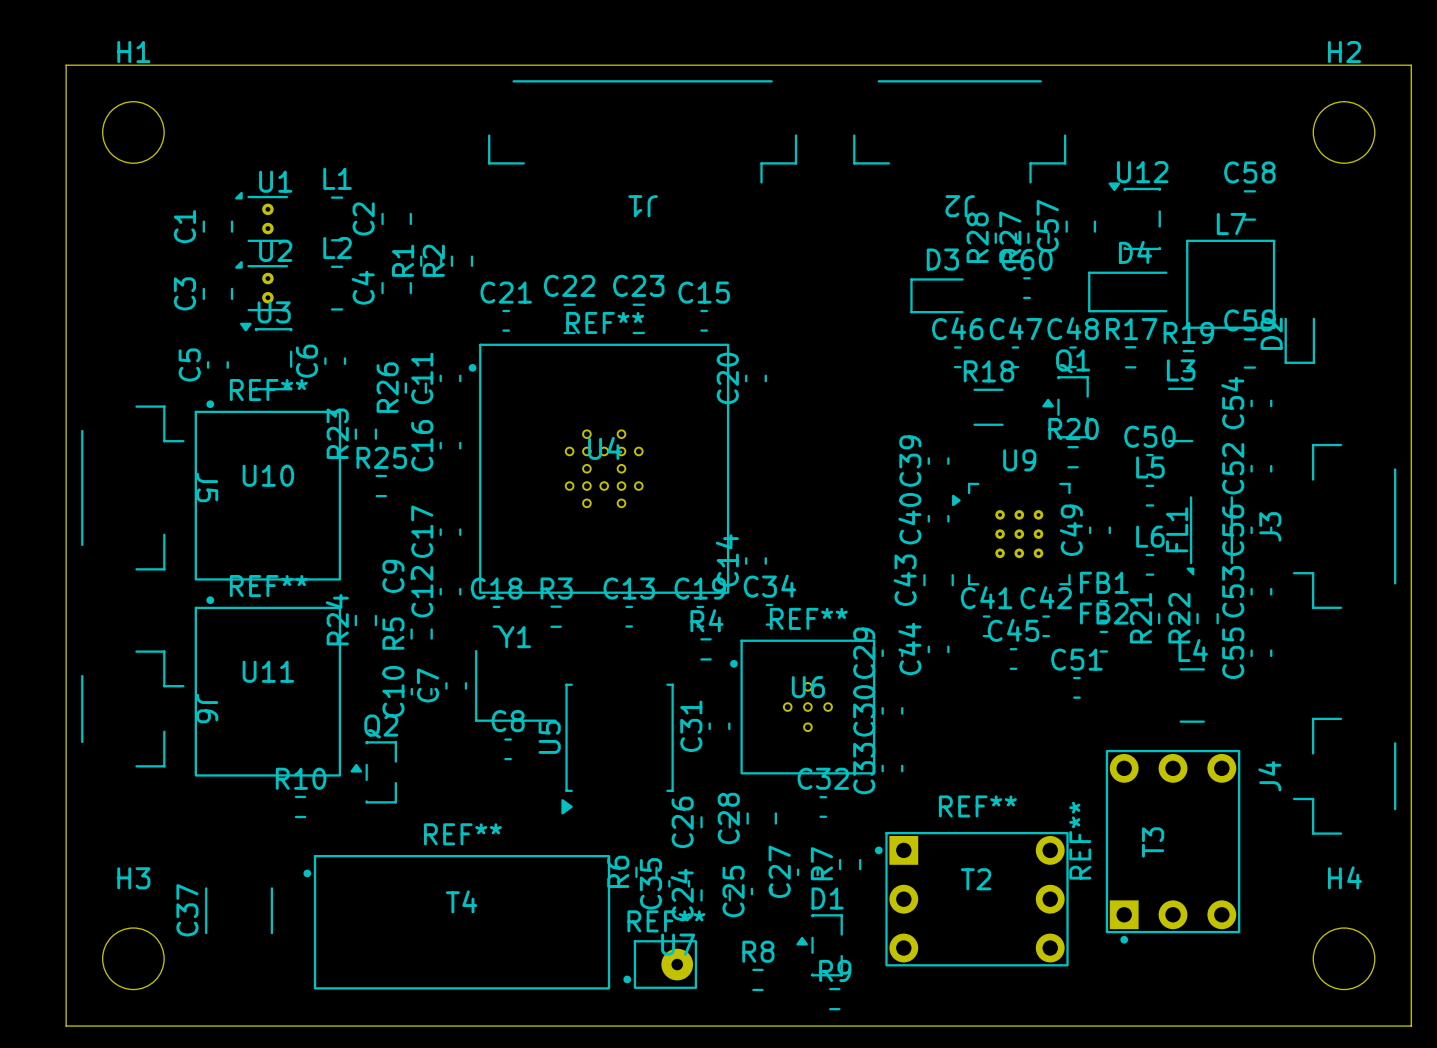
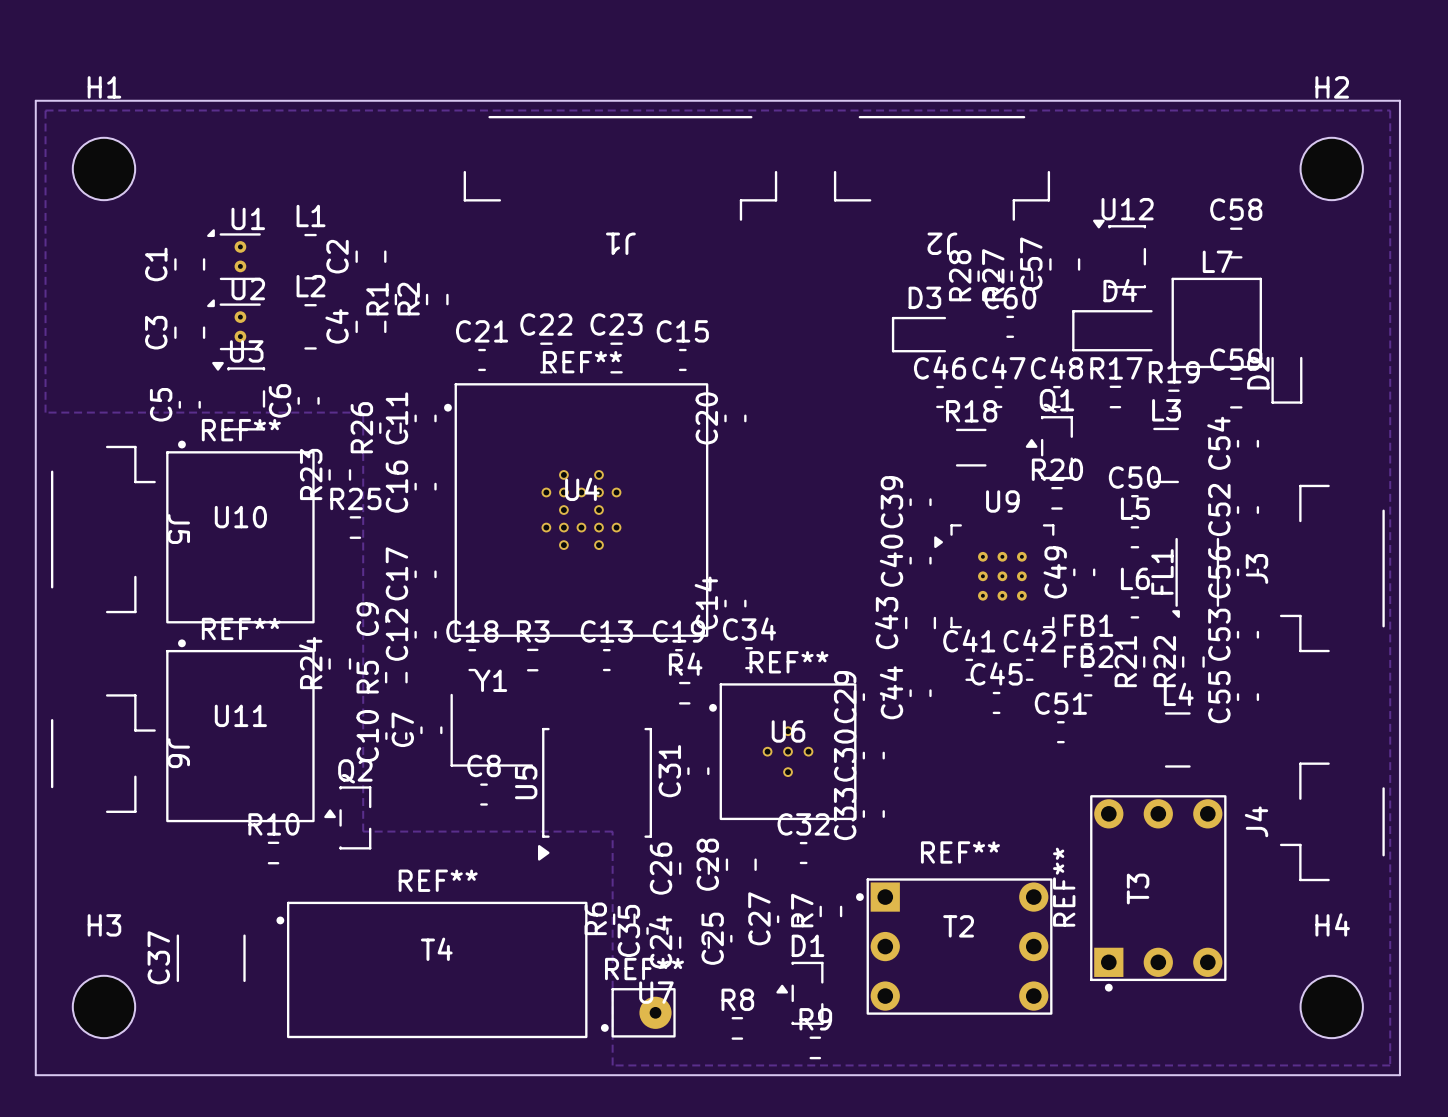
zone outline: none -> (45, 110) (1390, 110) (1390, 1065) (612, 1065) (612, 831) (363, 831) (363, 412) (45, 412) (45, 110)

